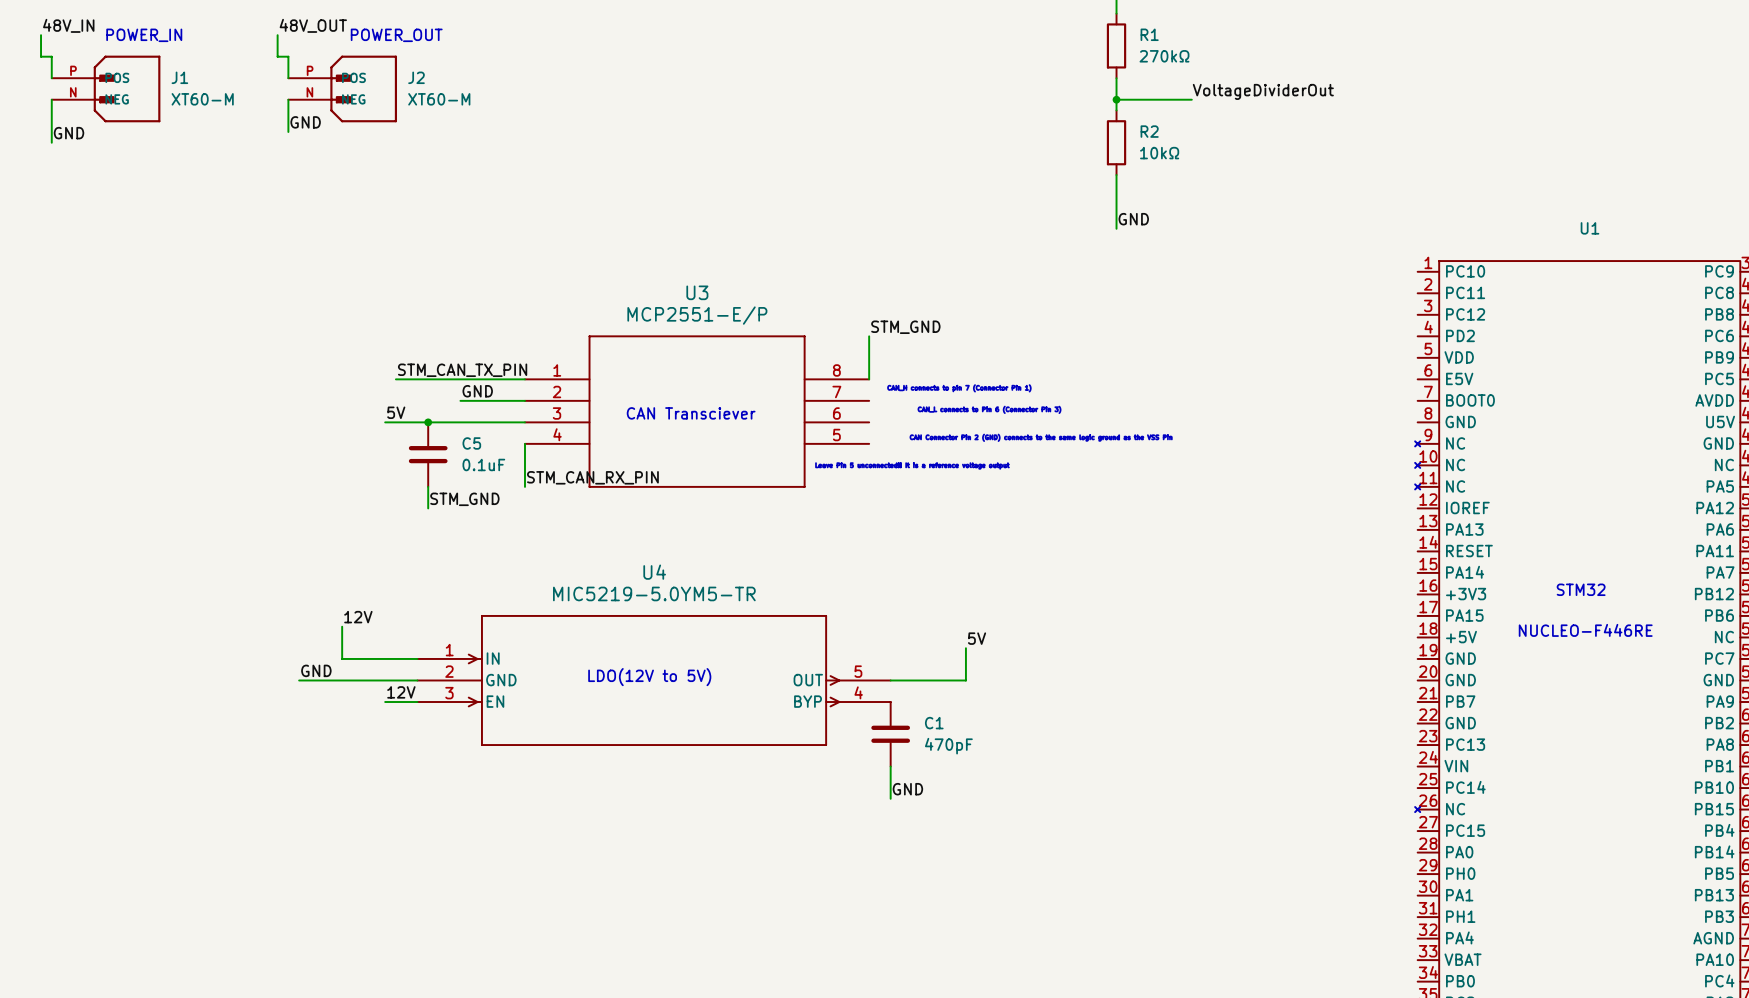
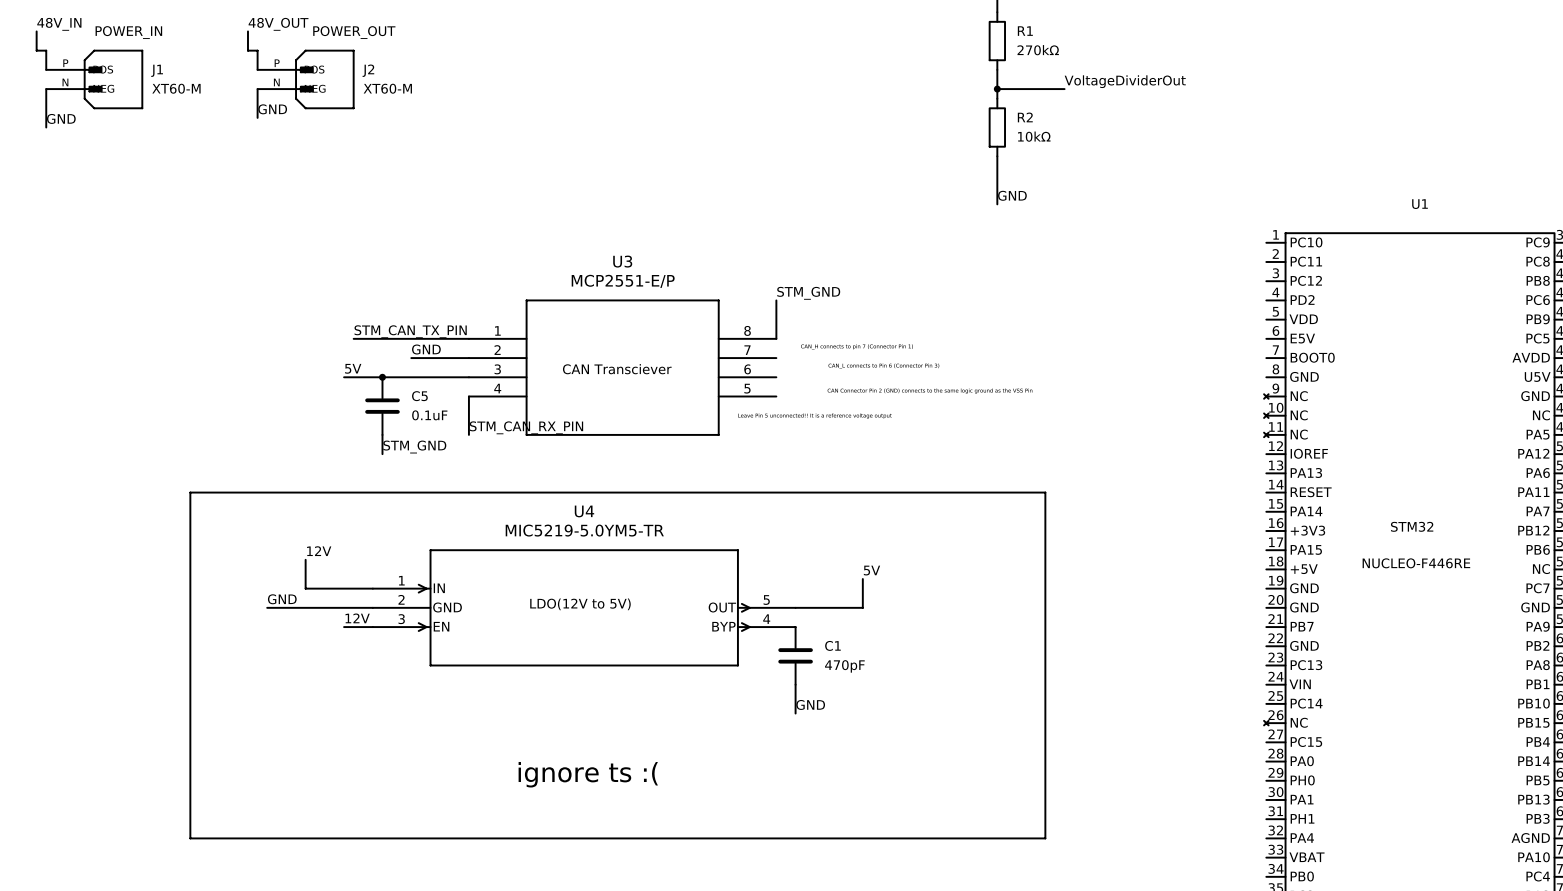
line: none -> (190, 492) (1045, 492) (1045, 838) (190, 838) (190, 492)
text: none -> ignore ts :( (588, 774)

